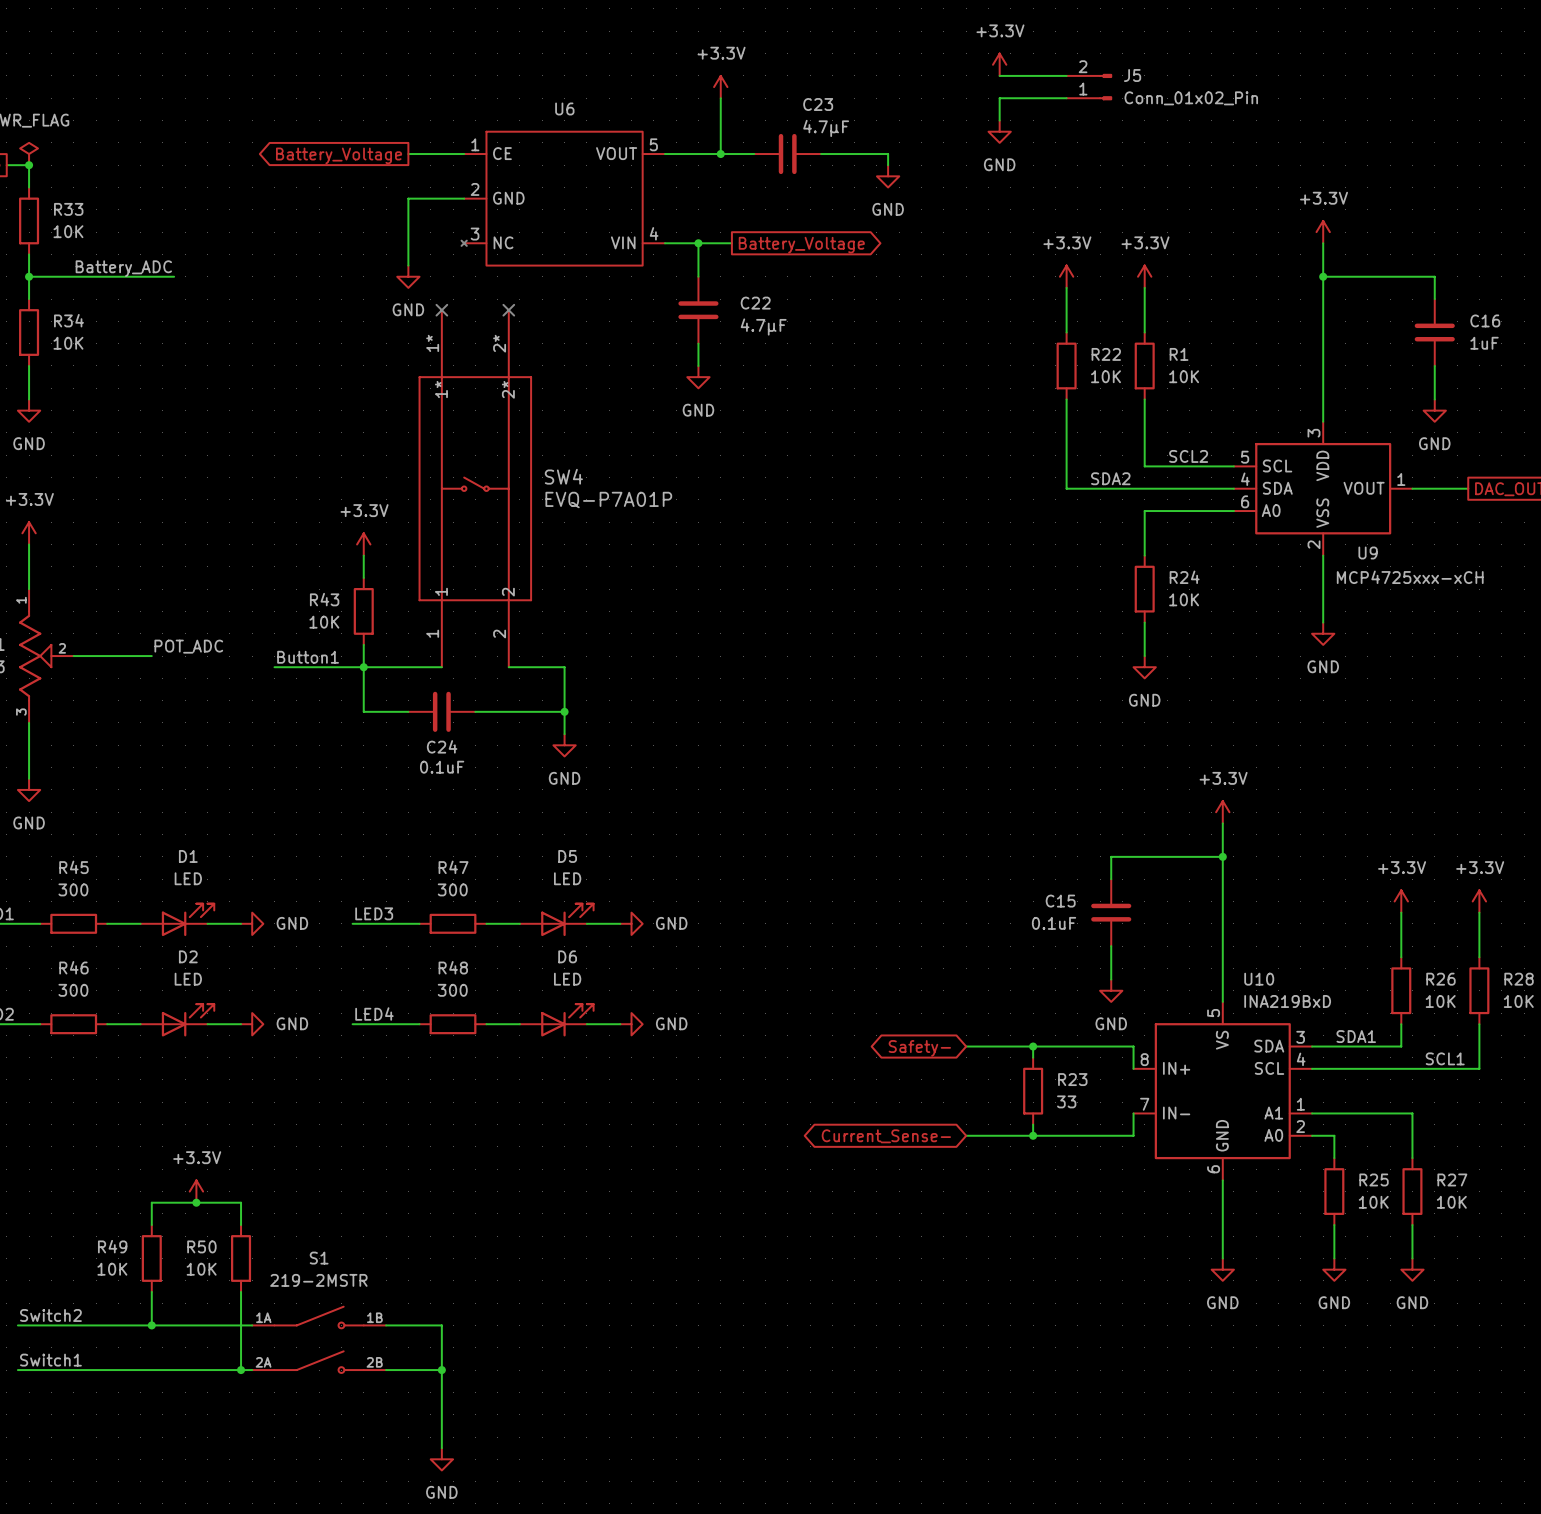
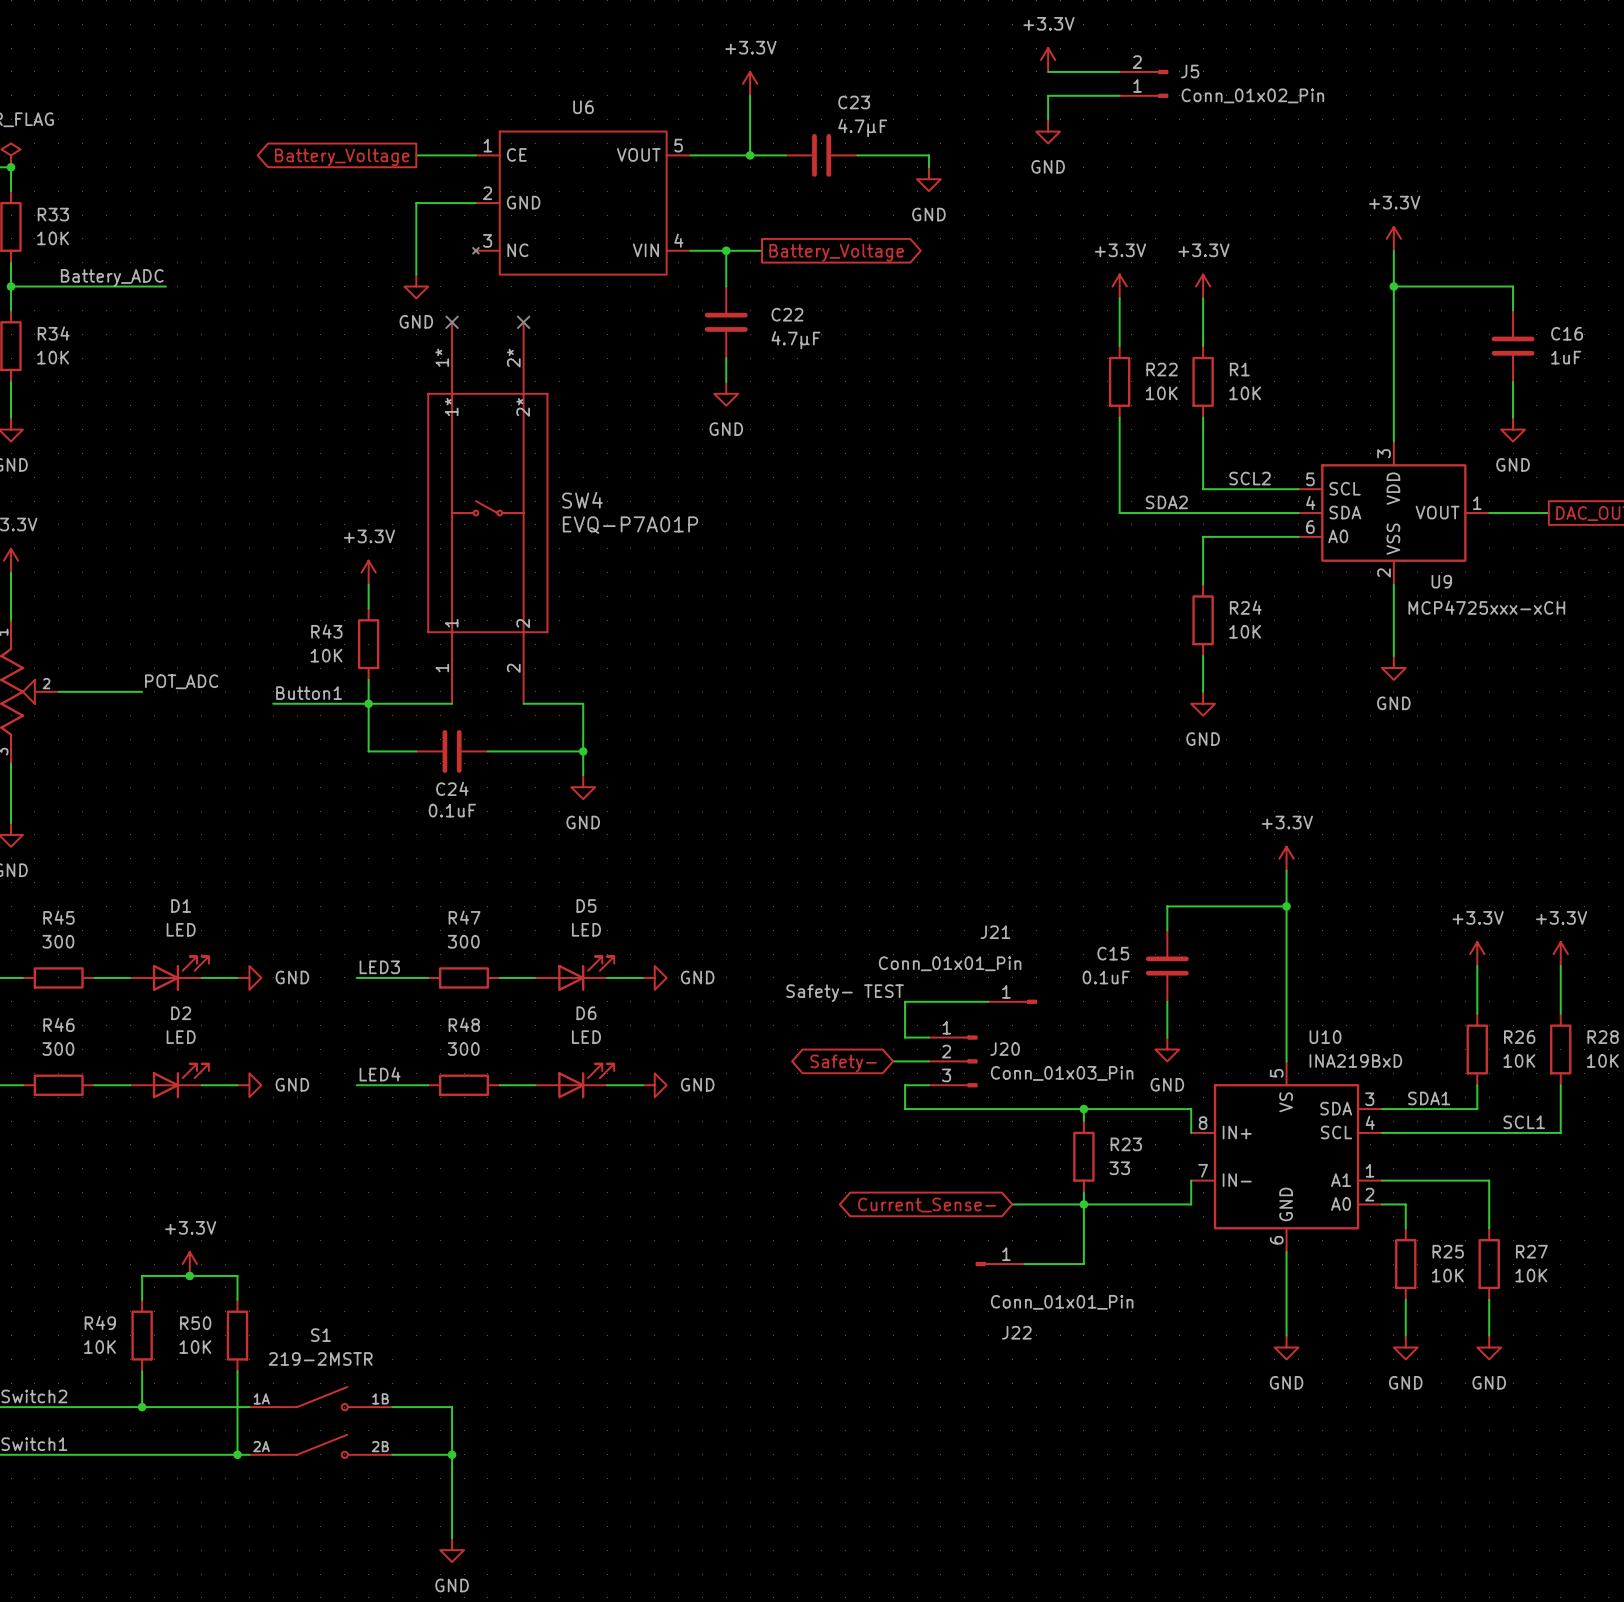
label: none -> Safety- TEST (845, 993)
wire: none -> (988, 1001) (905, 1001) (905, 1037) (928, 1037)
J21: none -> Conn_01x01_Pin (1012, 1001)
wire: none -> (893, 1061) (928, 1061)
J20: none -> Conn_01x03_Pin (953, 1061)
wire: none -> (928, 1085) (905, 1085) (905, 1109) (1012, 1109)
global label position: Safety- (919, 1048) -> Safety- (843, 1063)
wire: none -> (1083, 1204) (1083, 1264) (1024, 1264)
J22: none -> Conn_01x01_Pin (1000, 1264)

